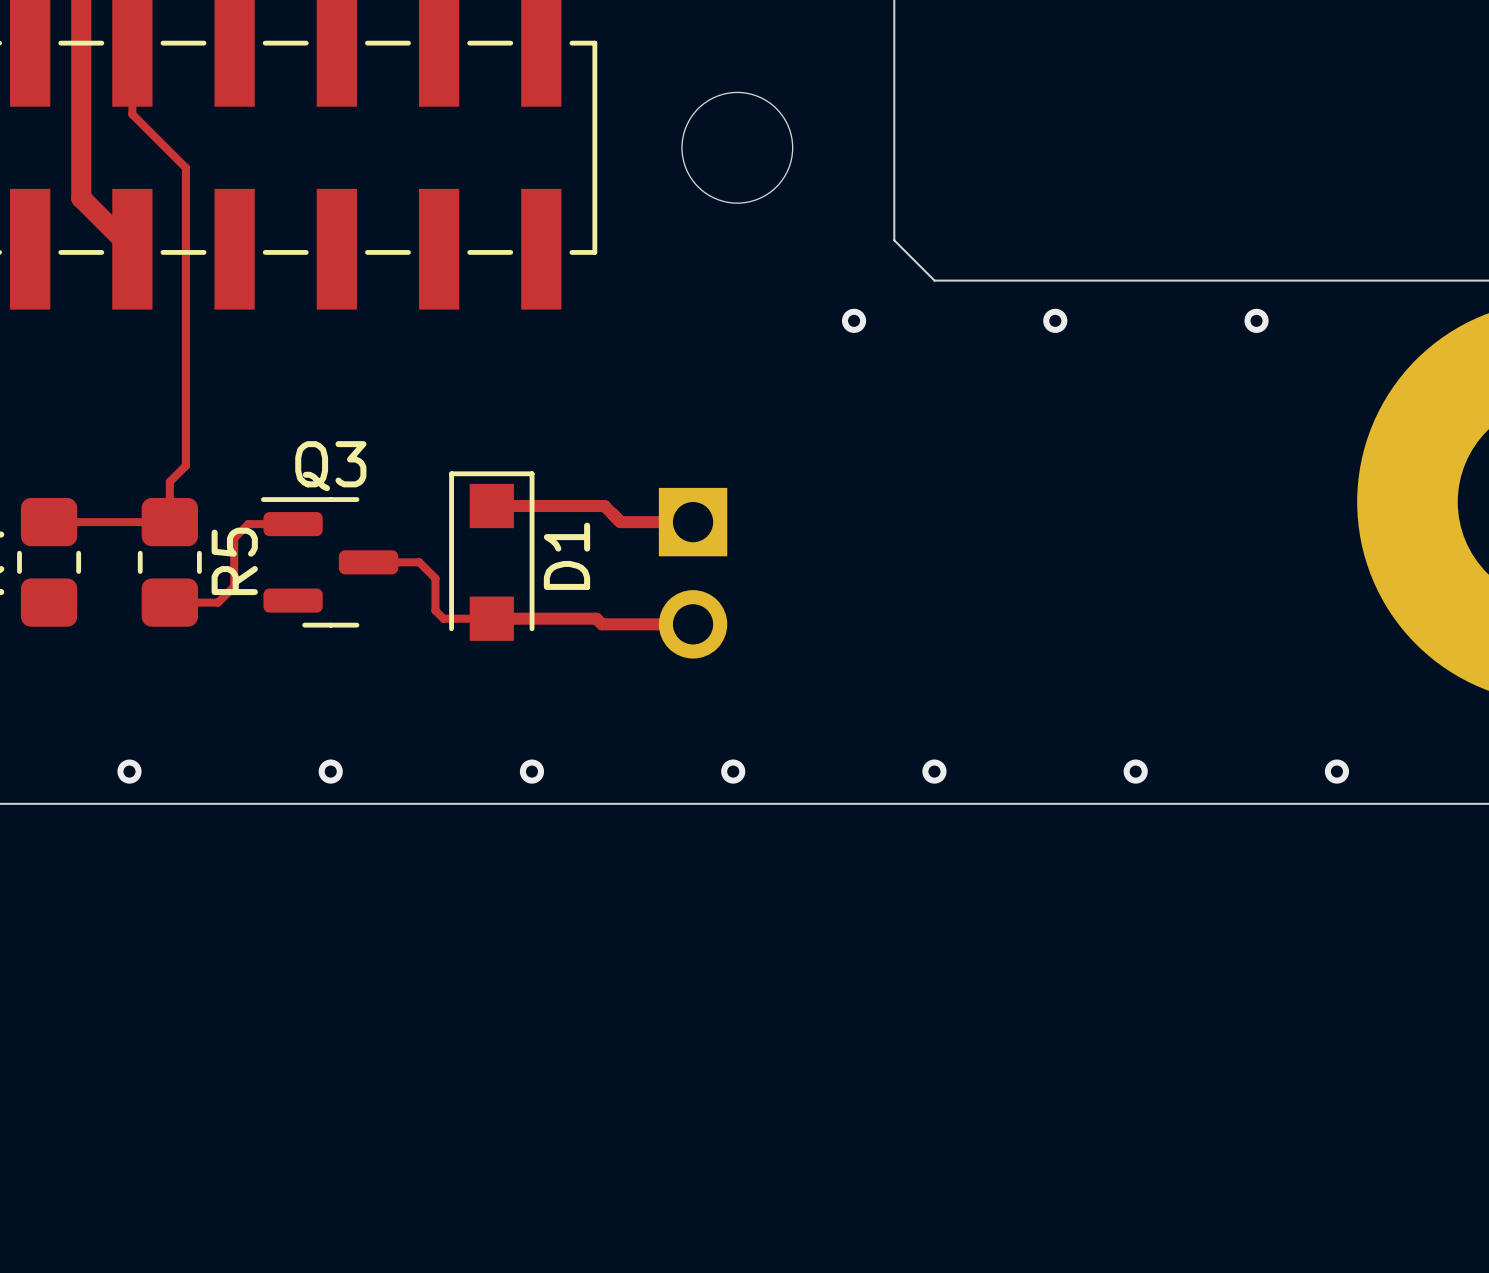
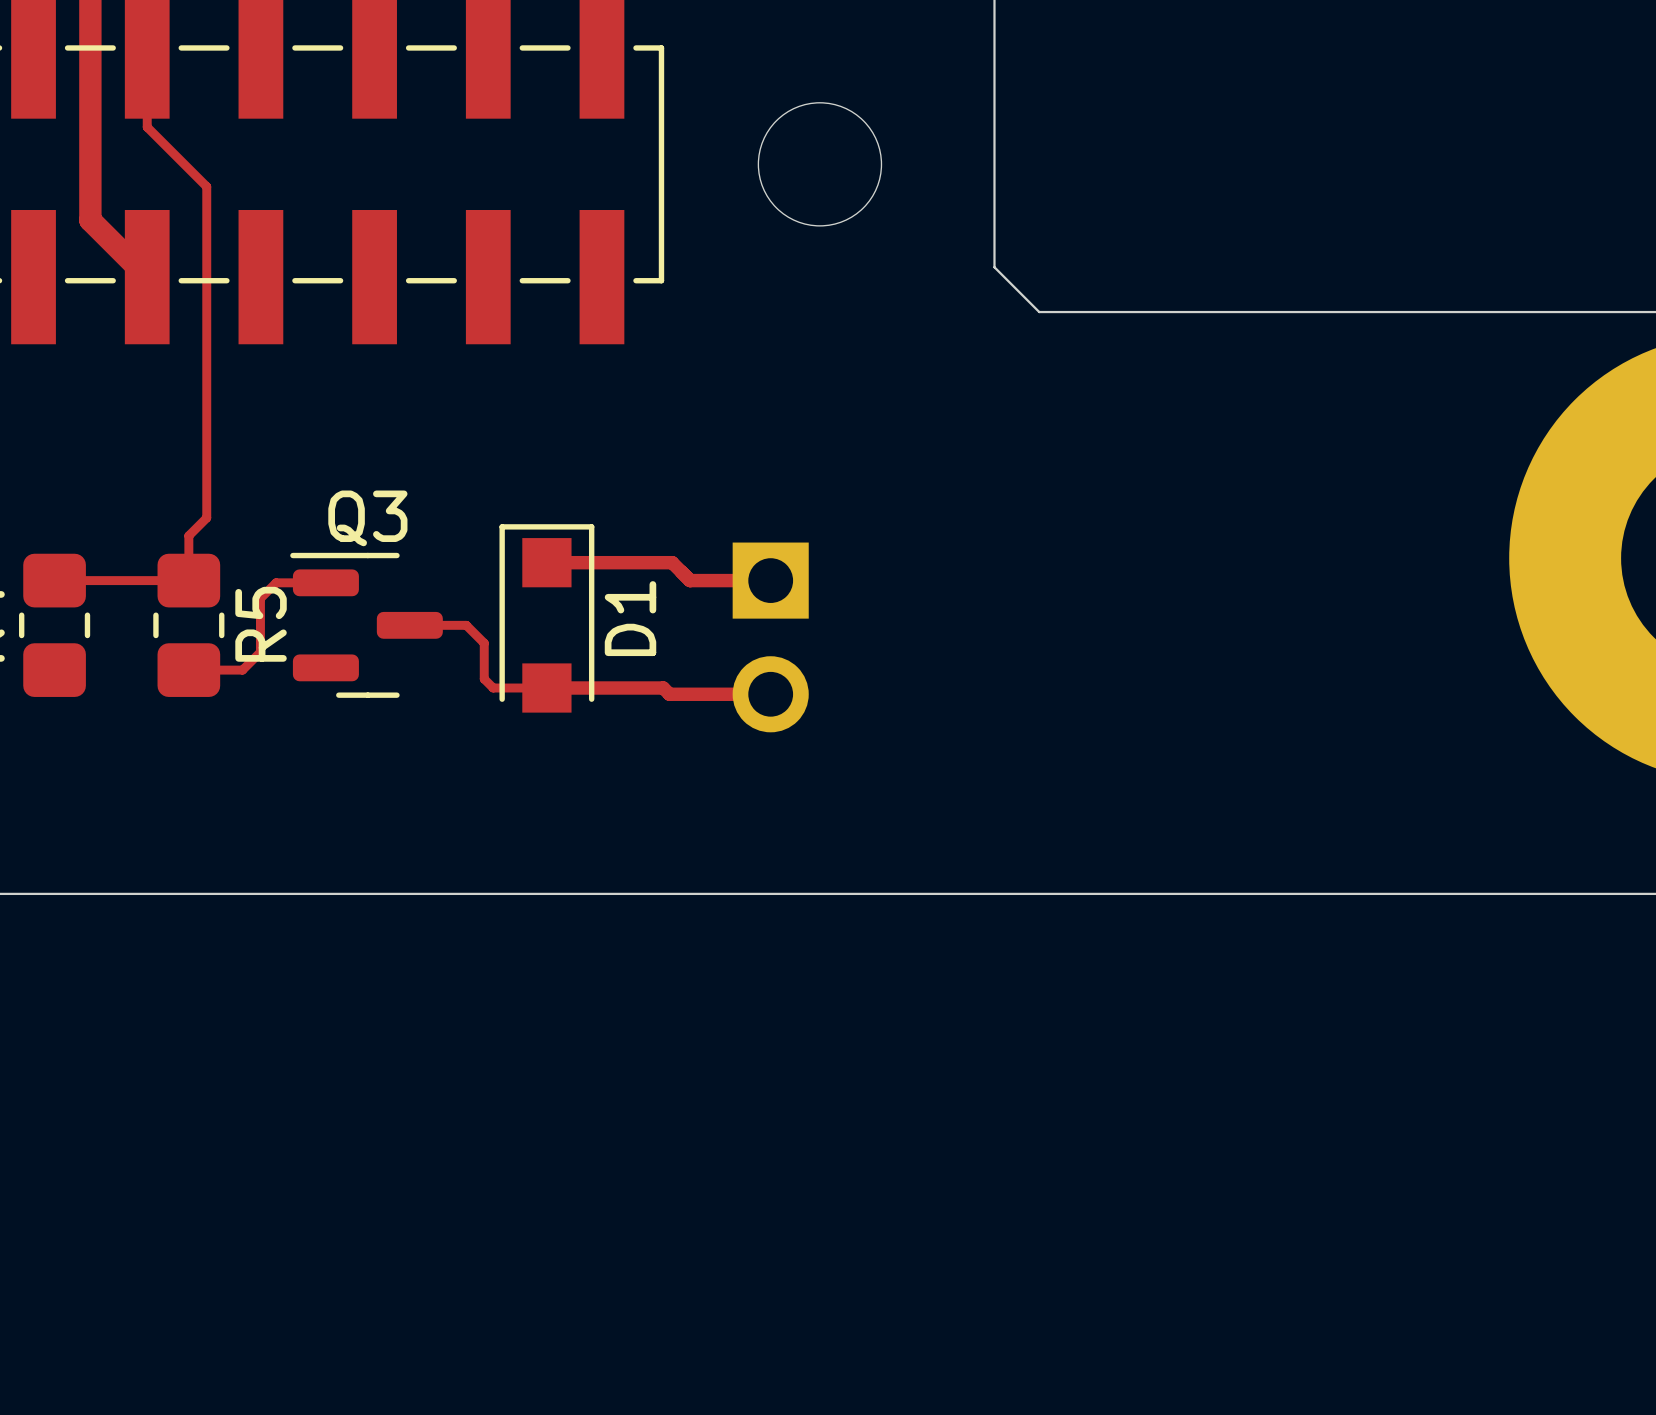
via: (854, 320) -> none
via: (1055, 320) -> none
via: (1256, 320) -> none
via: (129, 771) -> none
via: (330, 771) -> none
via: (531, 771) -> none
via: (733, 771) -> none
via: (934, 771) -> none
via: (1135, 771) -> none
via: (1336, 771) -> none

